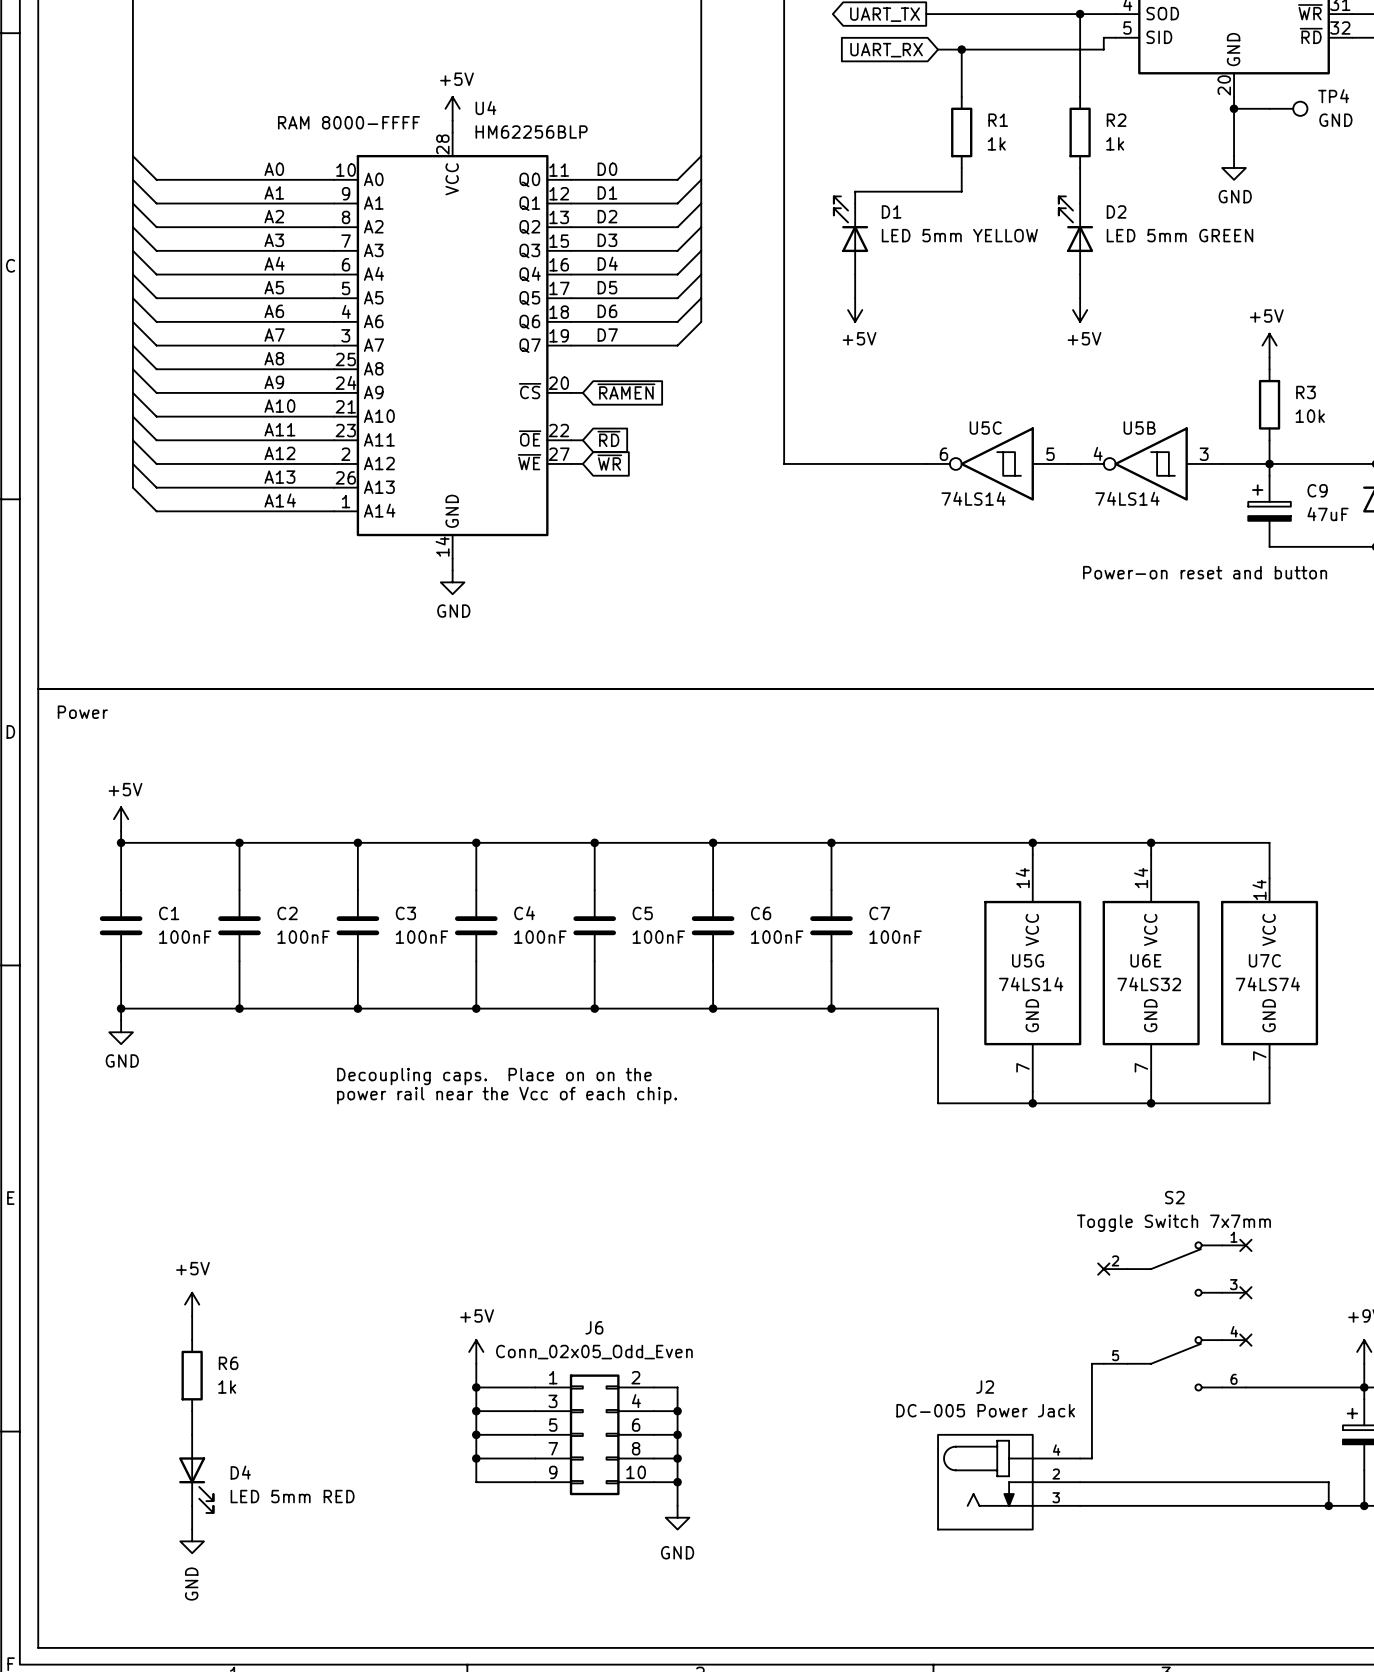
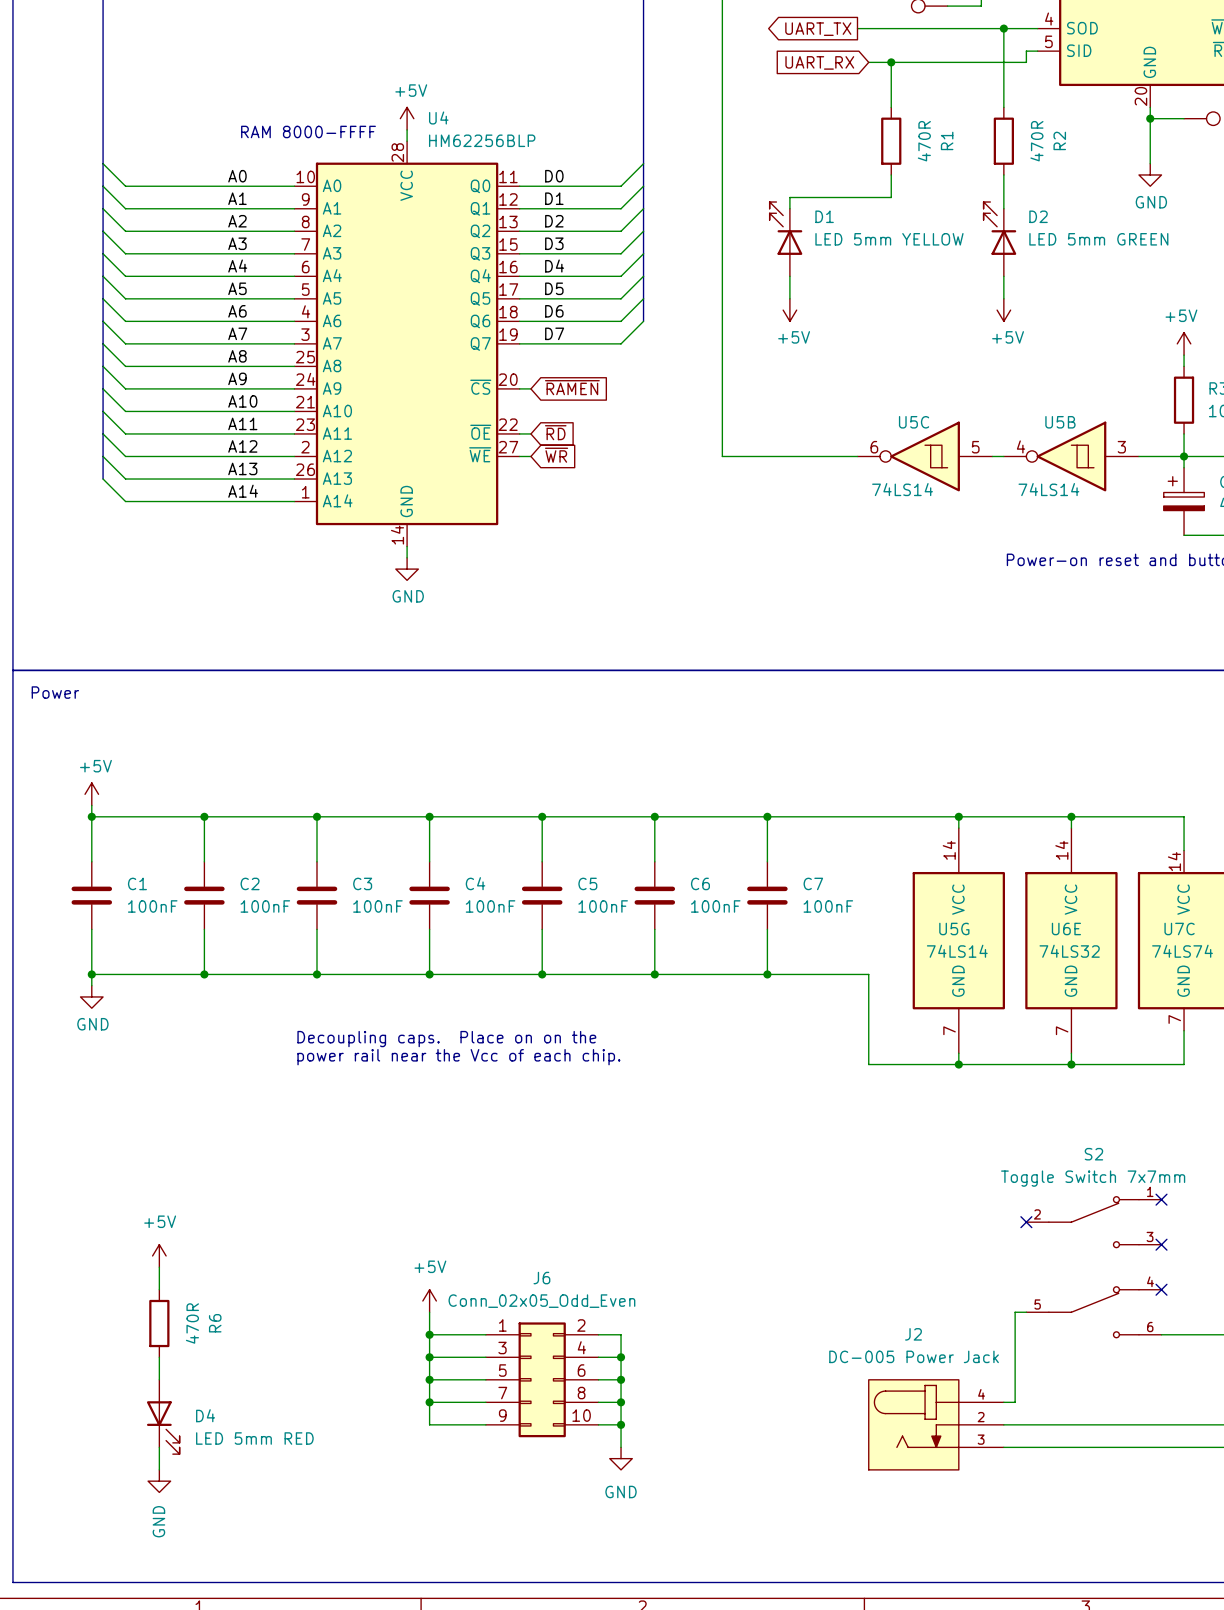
R1 name rotation: 0° (998, 120) -> 90° counterclockwise (947, 140)
R2 name rotation: 0° (1116, 120) -> 90° counterclockwise (1059, 140)
R1 value: 1k (996, 143) -> 470R (924, 141)
R2 value: 1k (1115, 143) -> 470R (1036, 141)
R6 name rotation: 0° (228, 1363) -> 90° counterclockwise (215, 1323)
R6 value: 1k (227, 1387) -> 470R (192, 1323)

